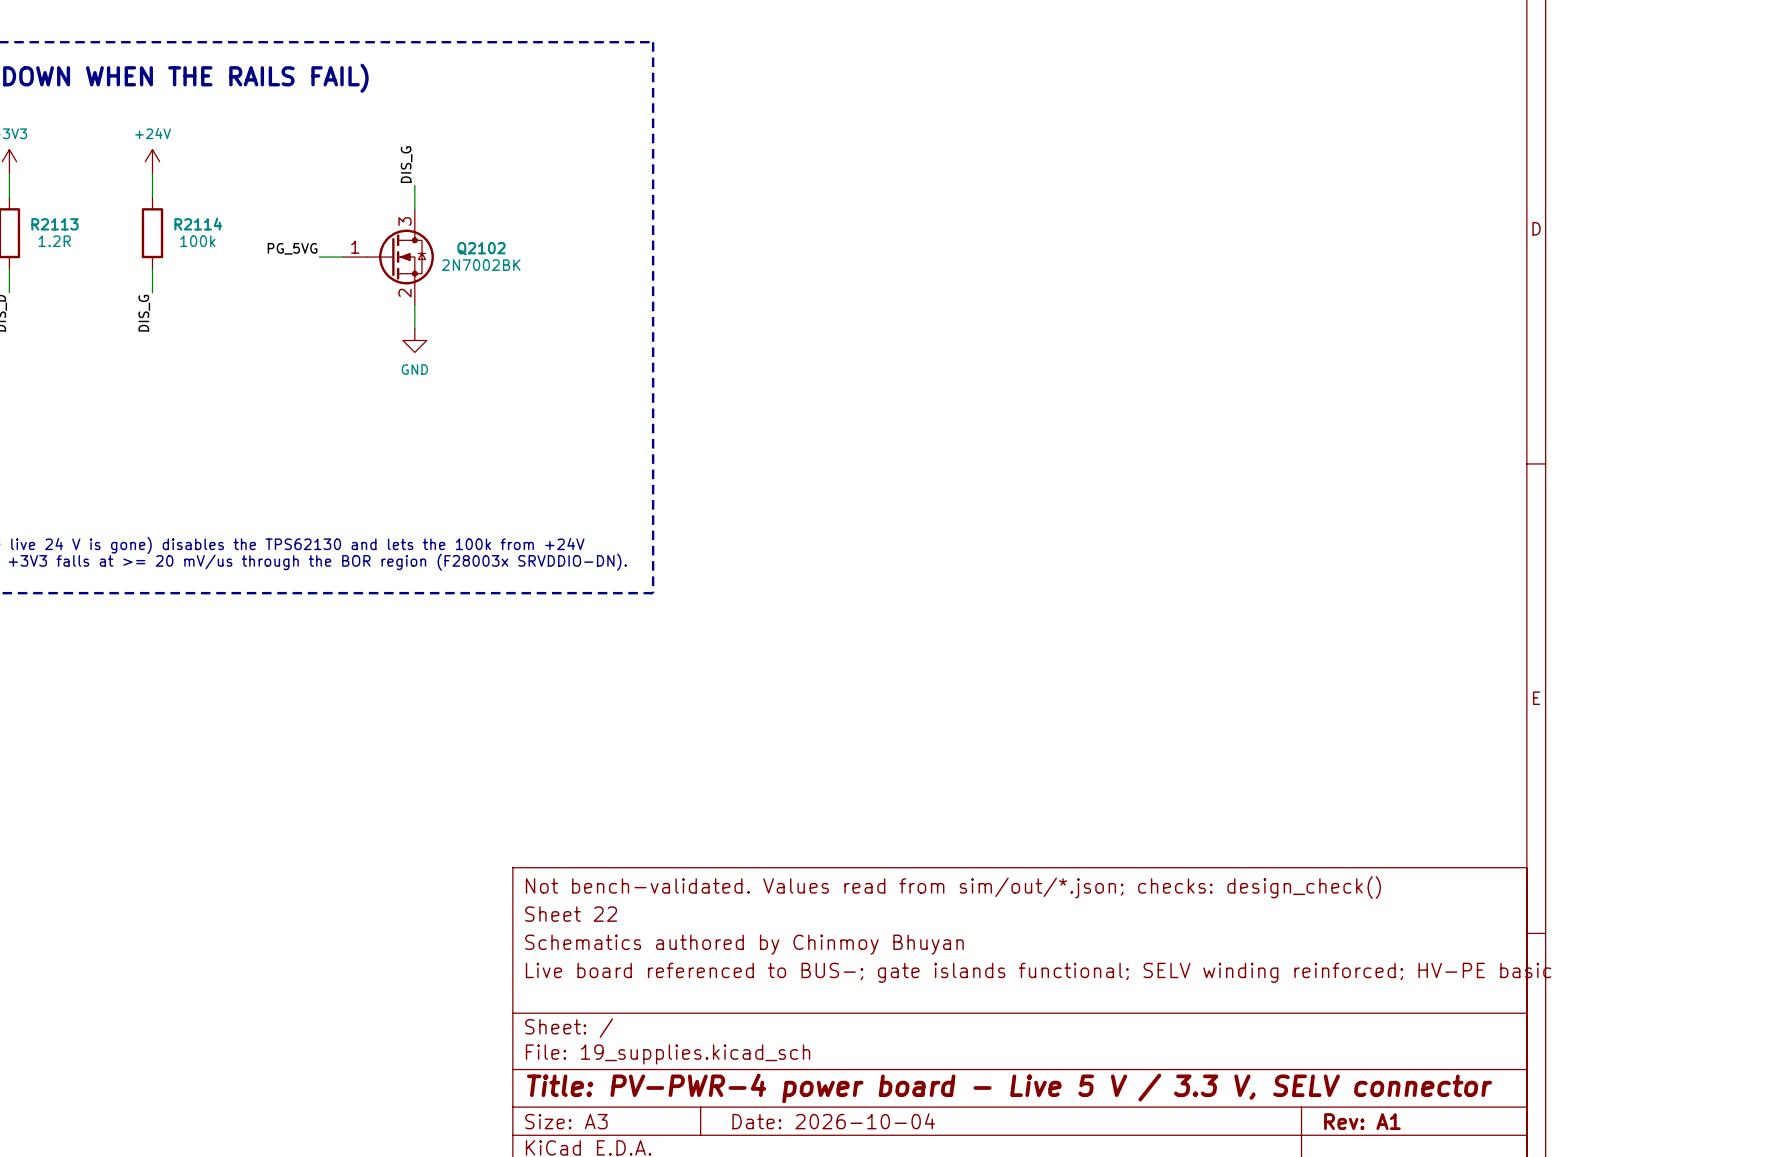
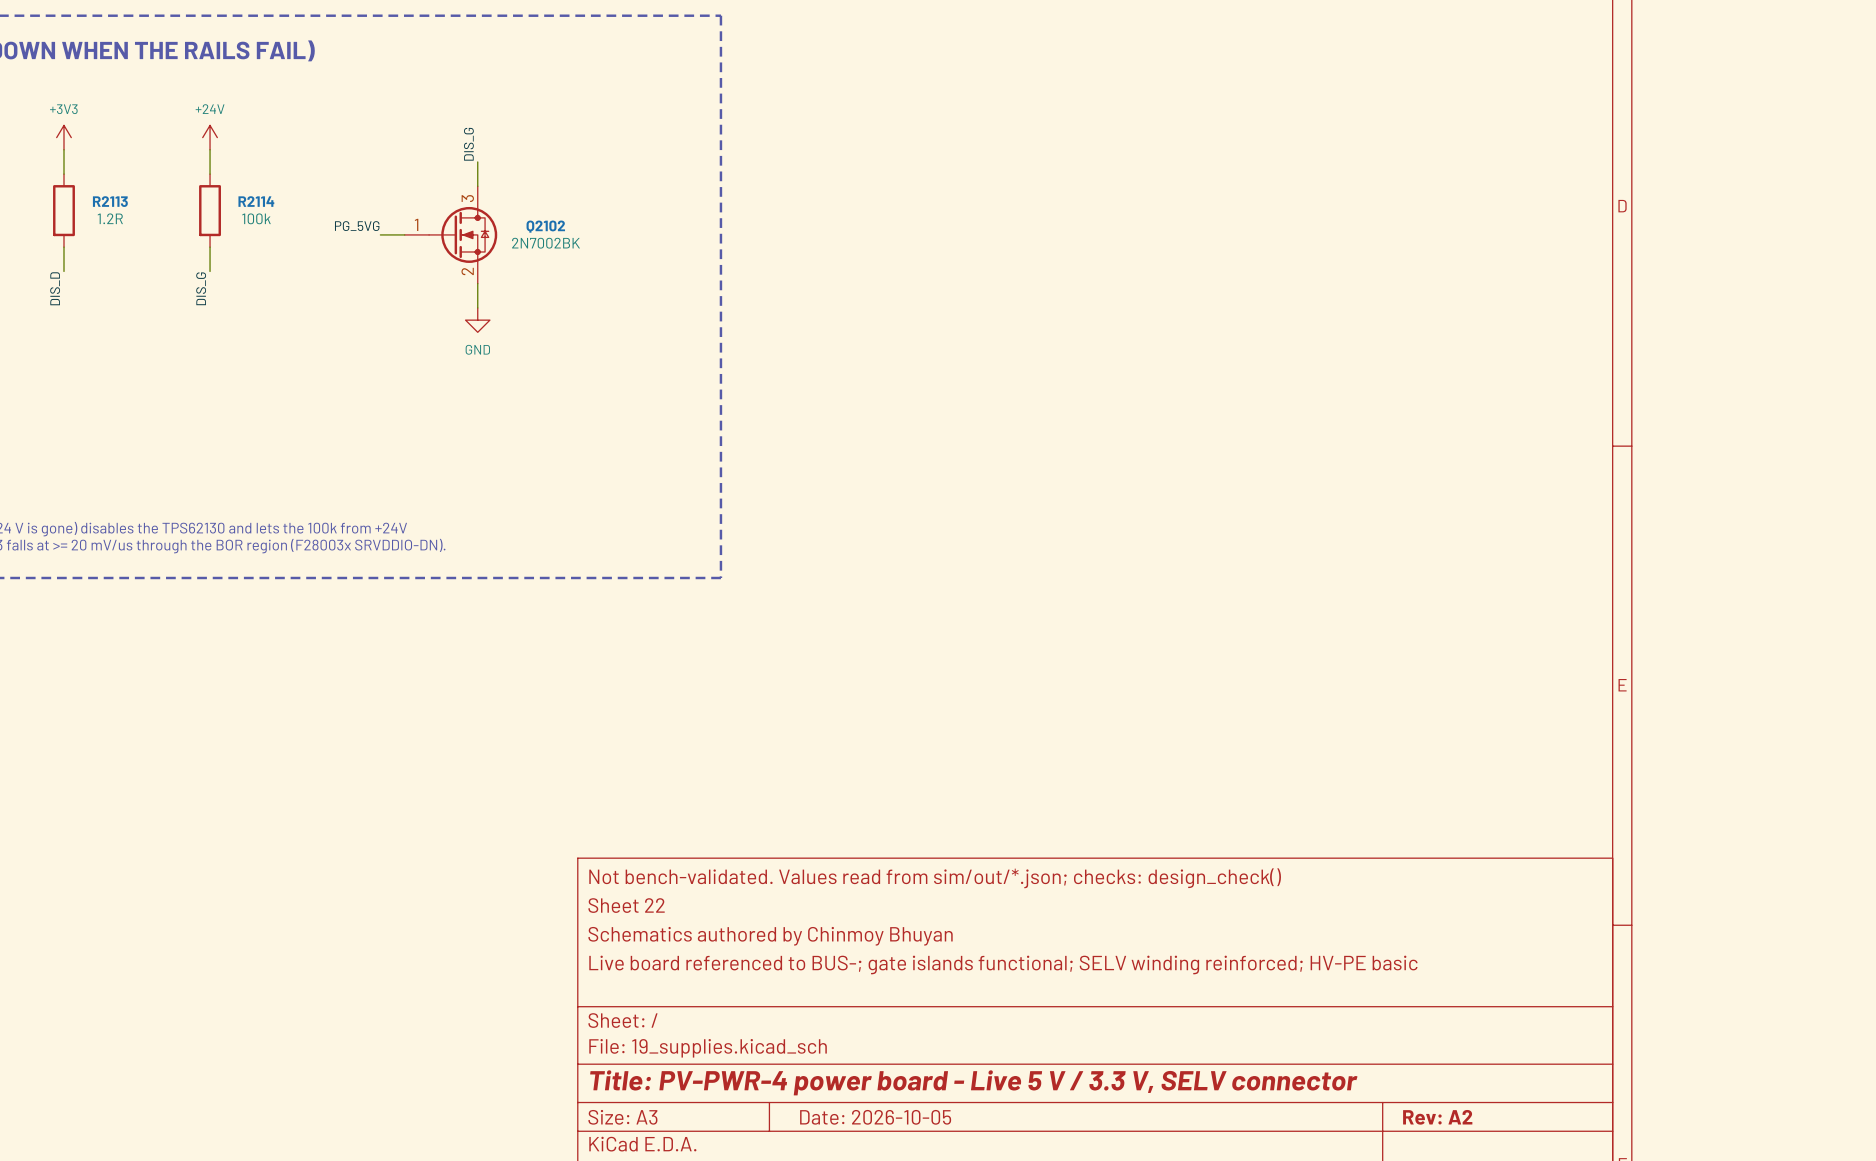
title block: Date: 2026-10-04 (833, 1121) -> Date: 2026-10-05 (875, 1117)
title block: Rev: A1 (1362, 1121) -> Rev: A2 (1437, 1117)

